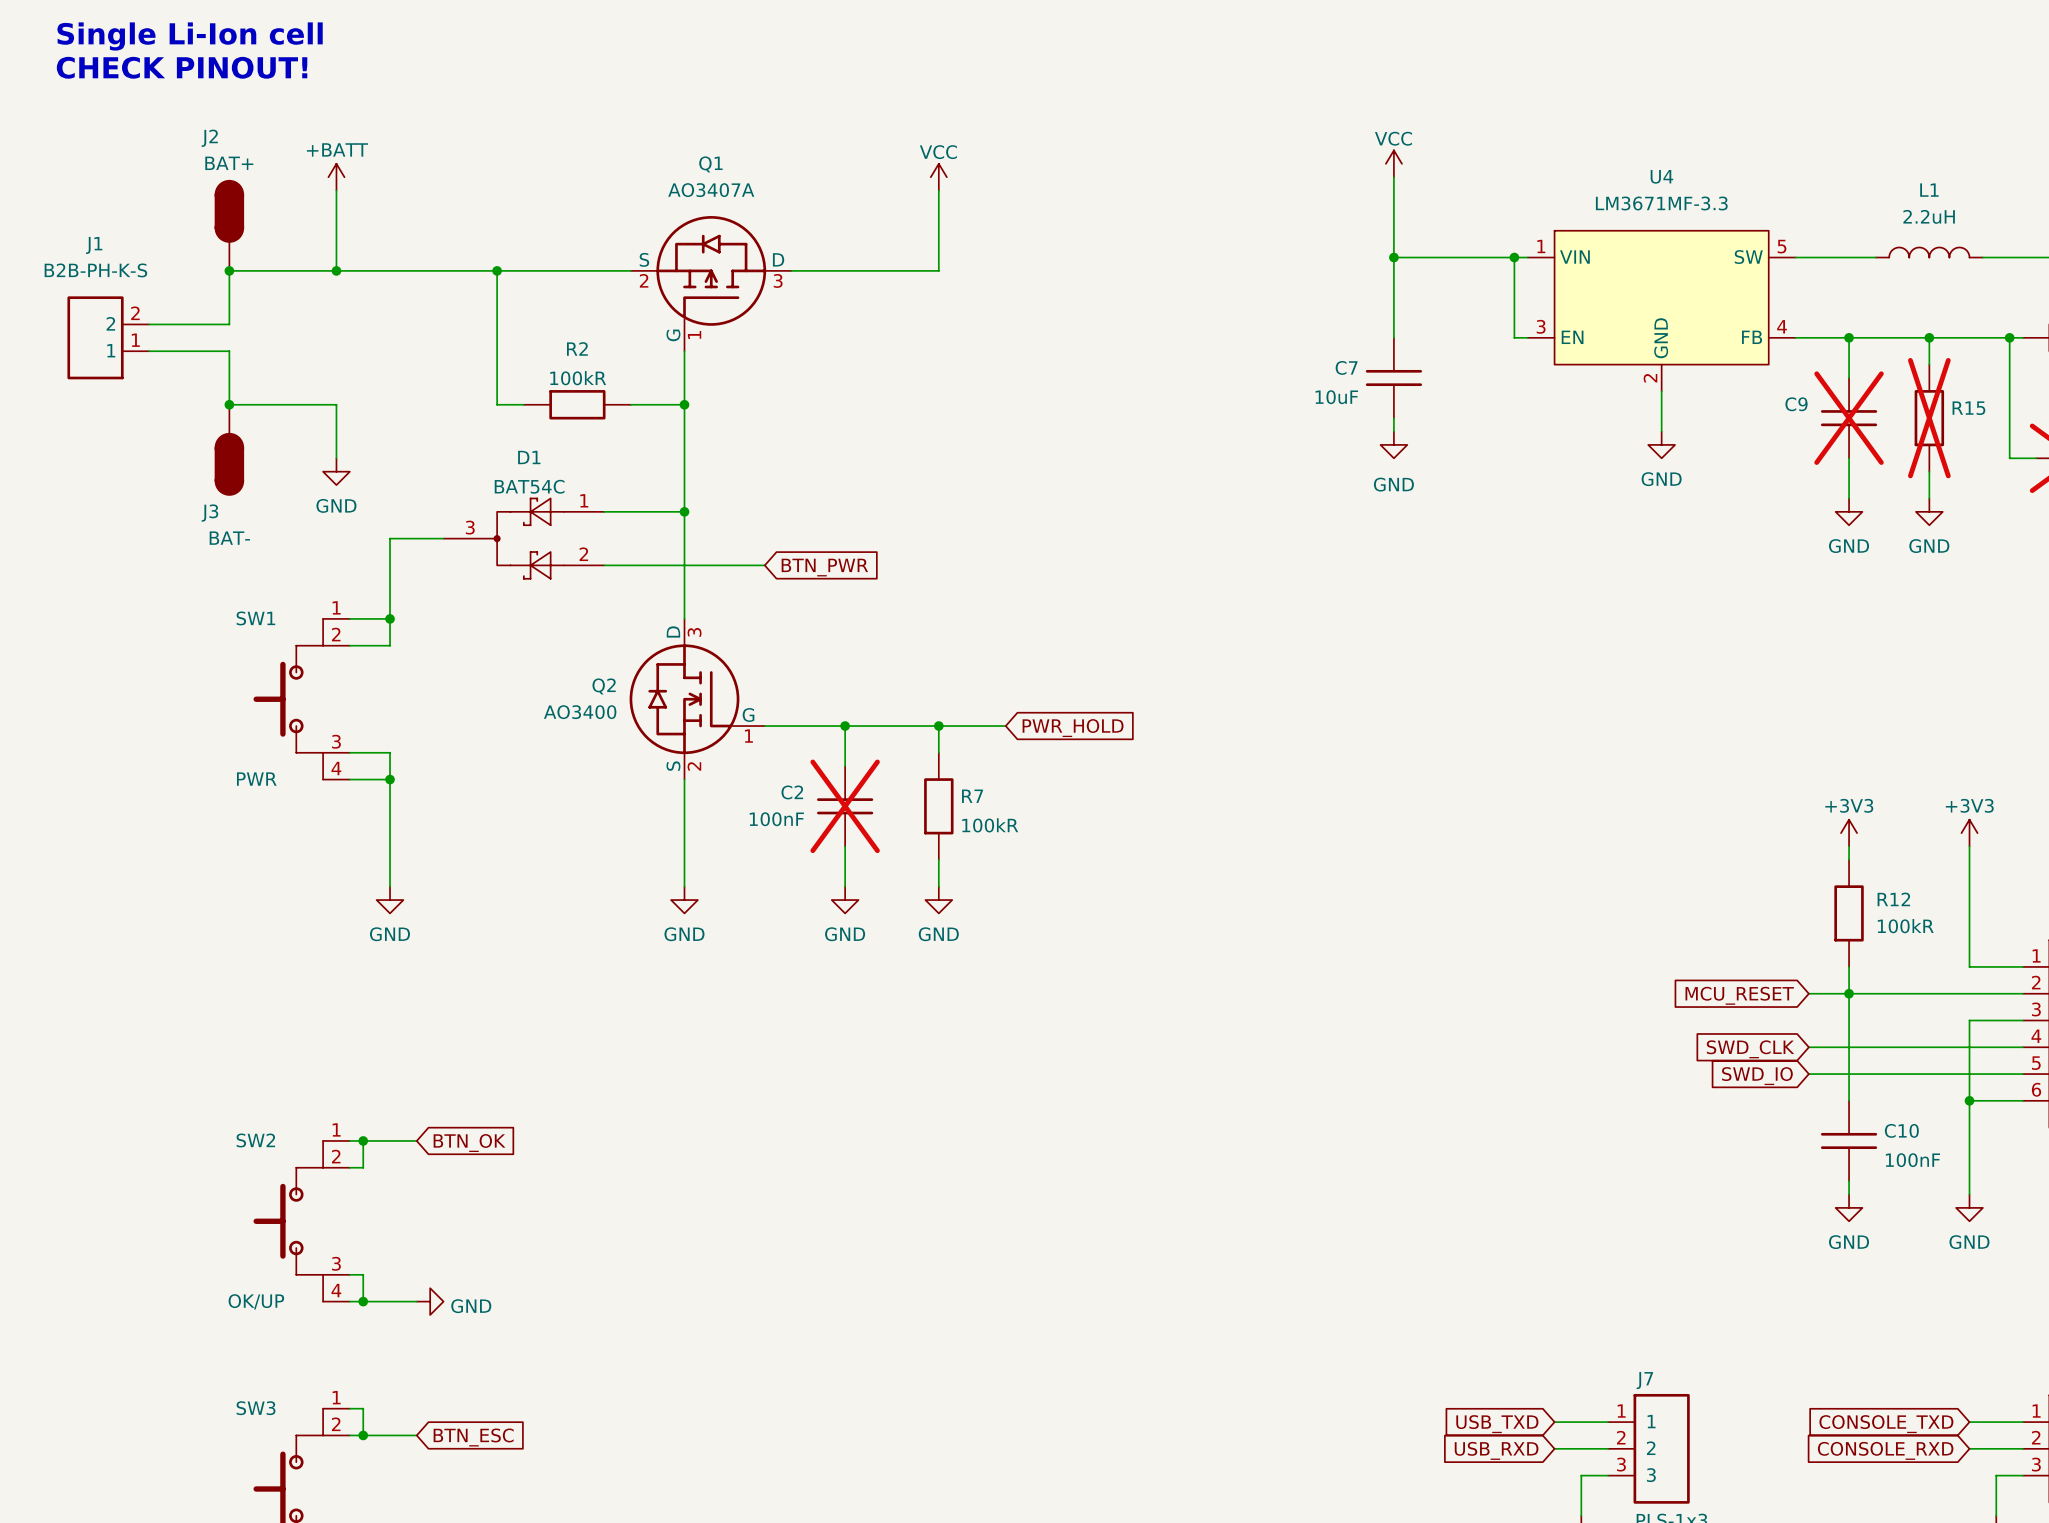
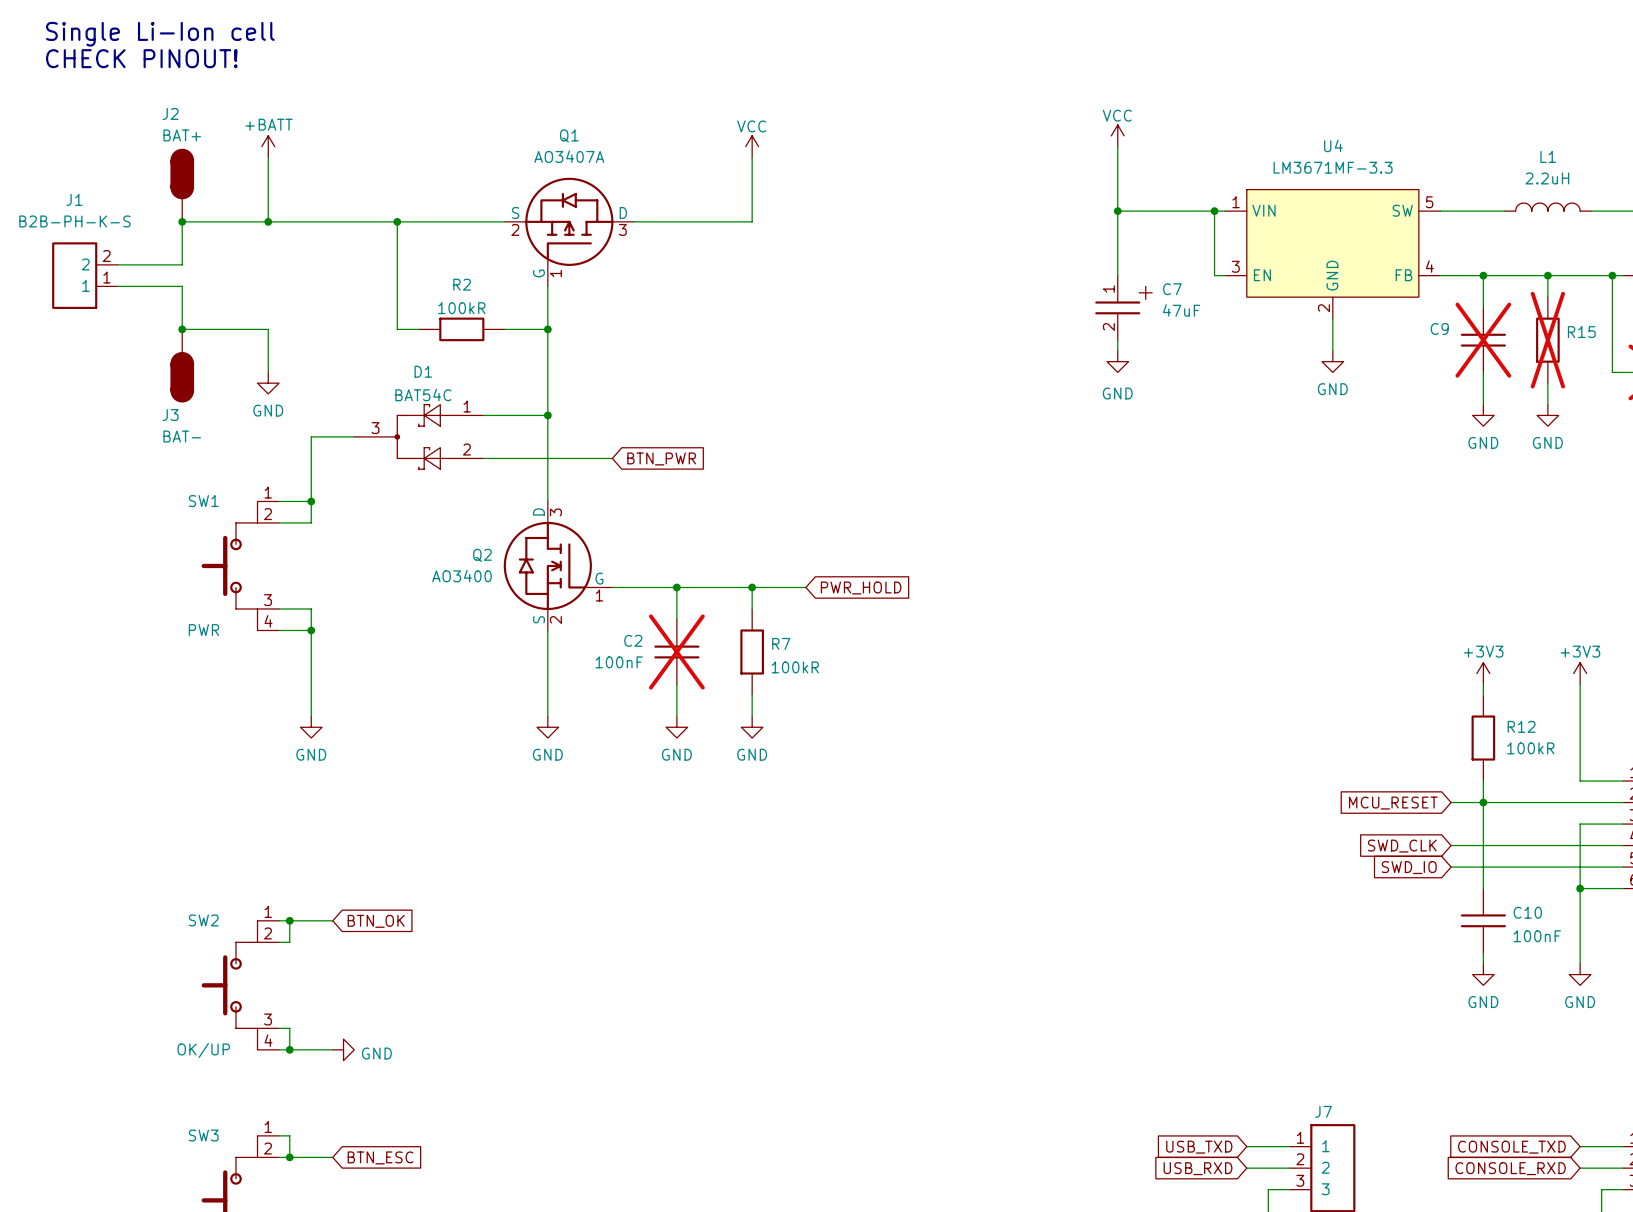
C7 symbol: [1365, 337, 1423, 419] -> [1095, 275, 1153, 341]
C7 name position: C7 (1346, 367) -> C7 (1172, 289)
C7 value: 10uF (1336, 397) -> 47uF (1181, 310)

